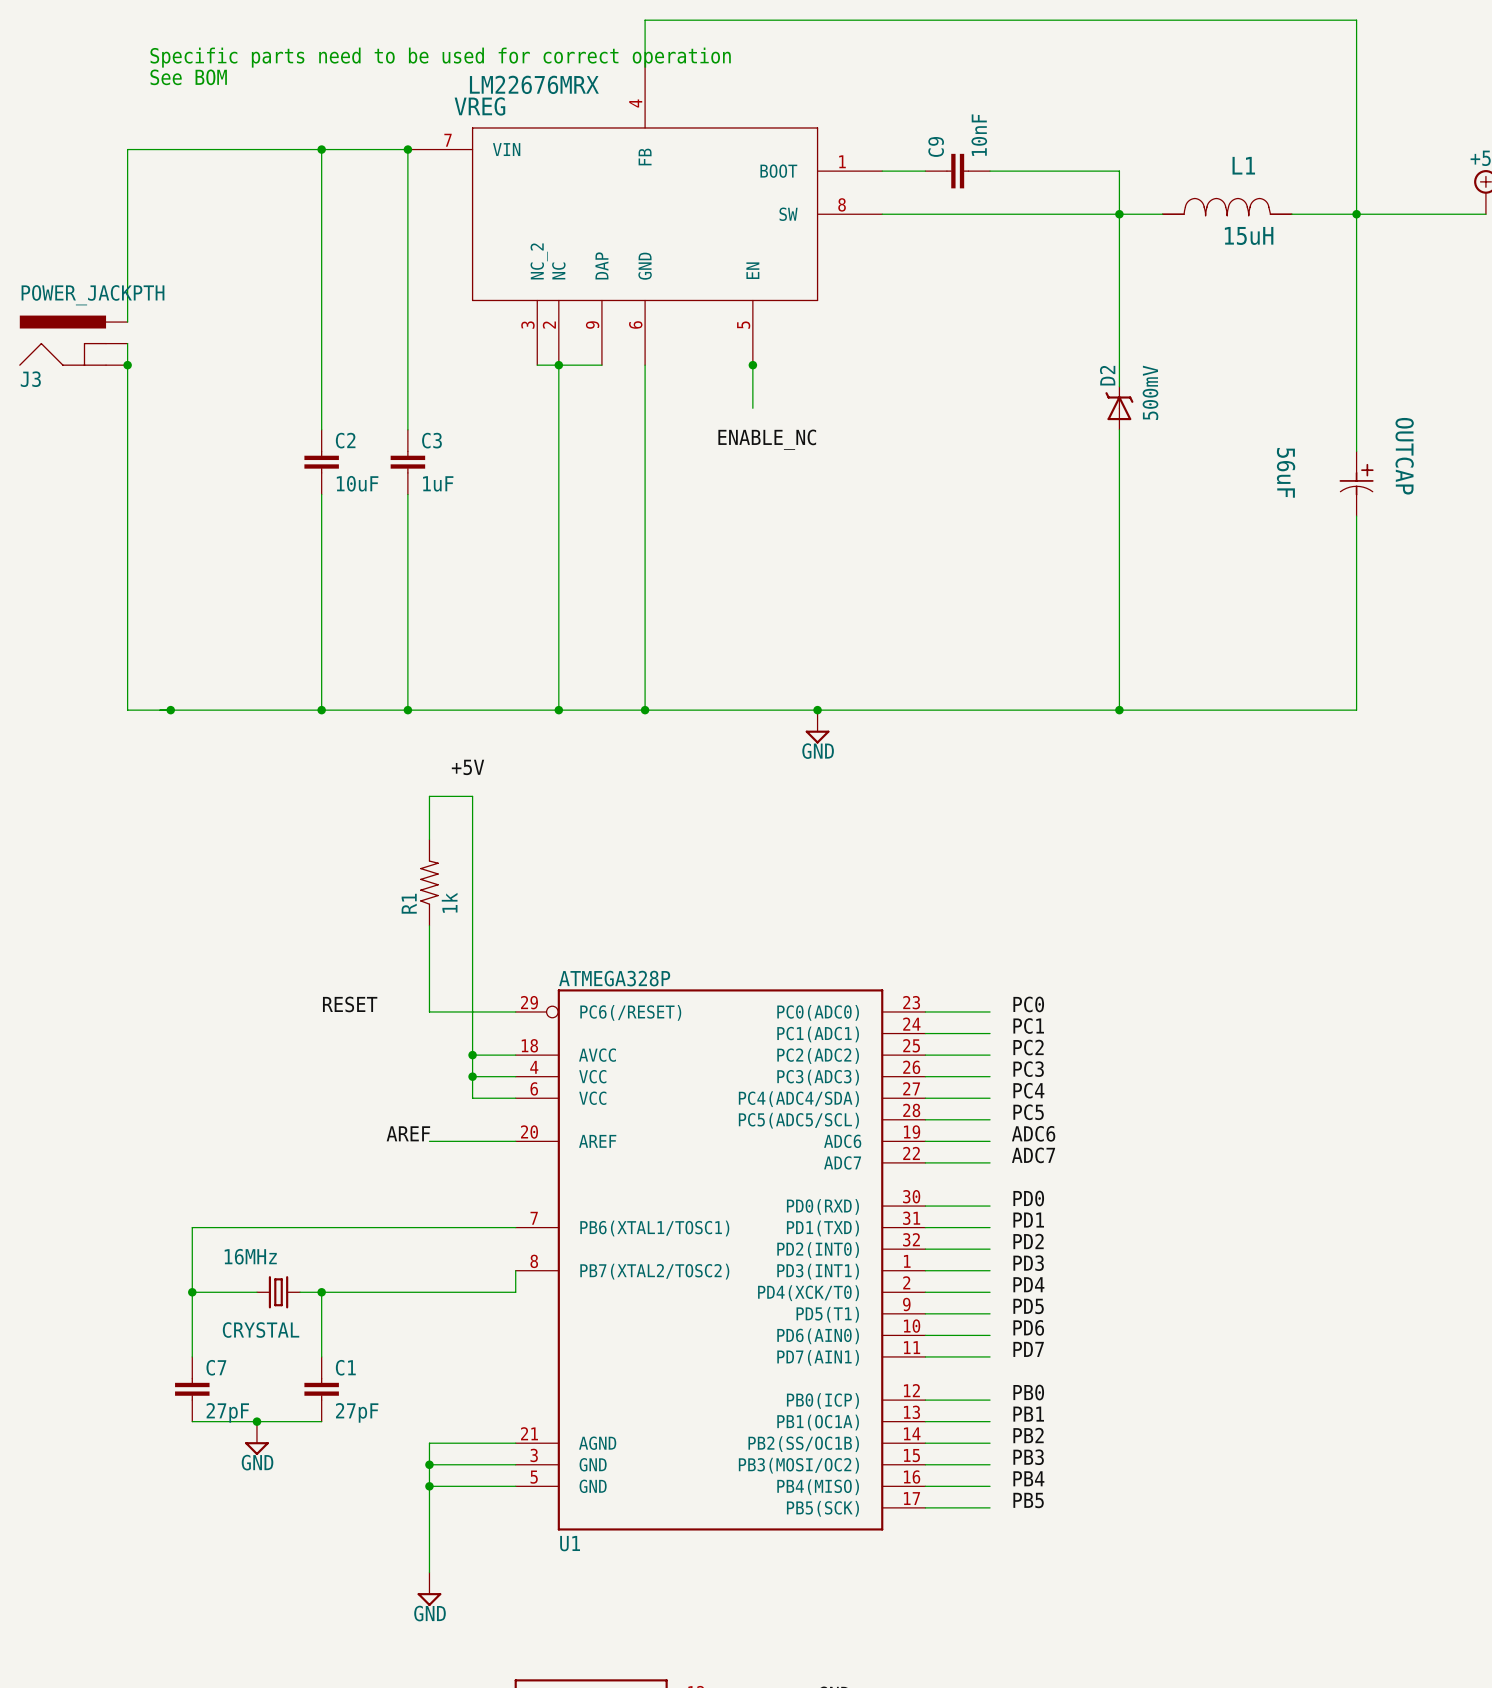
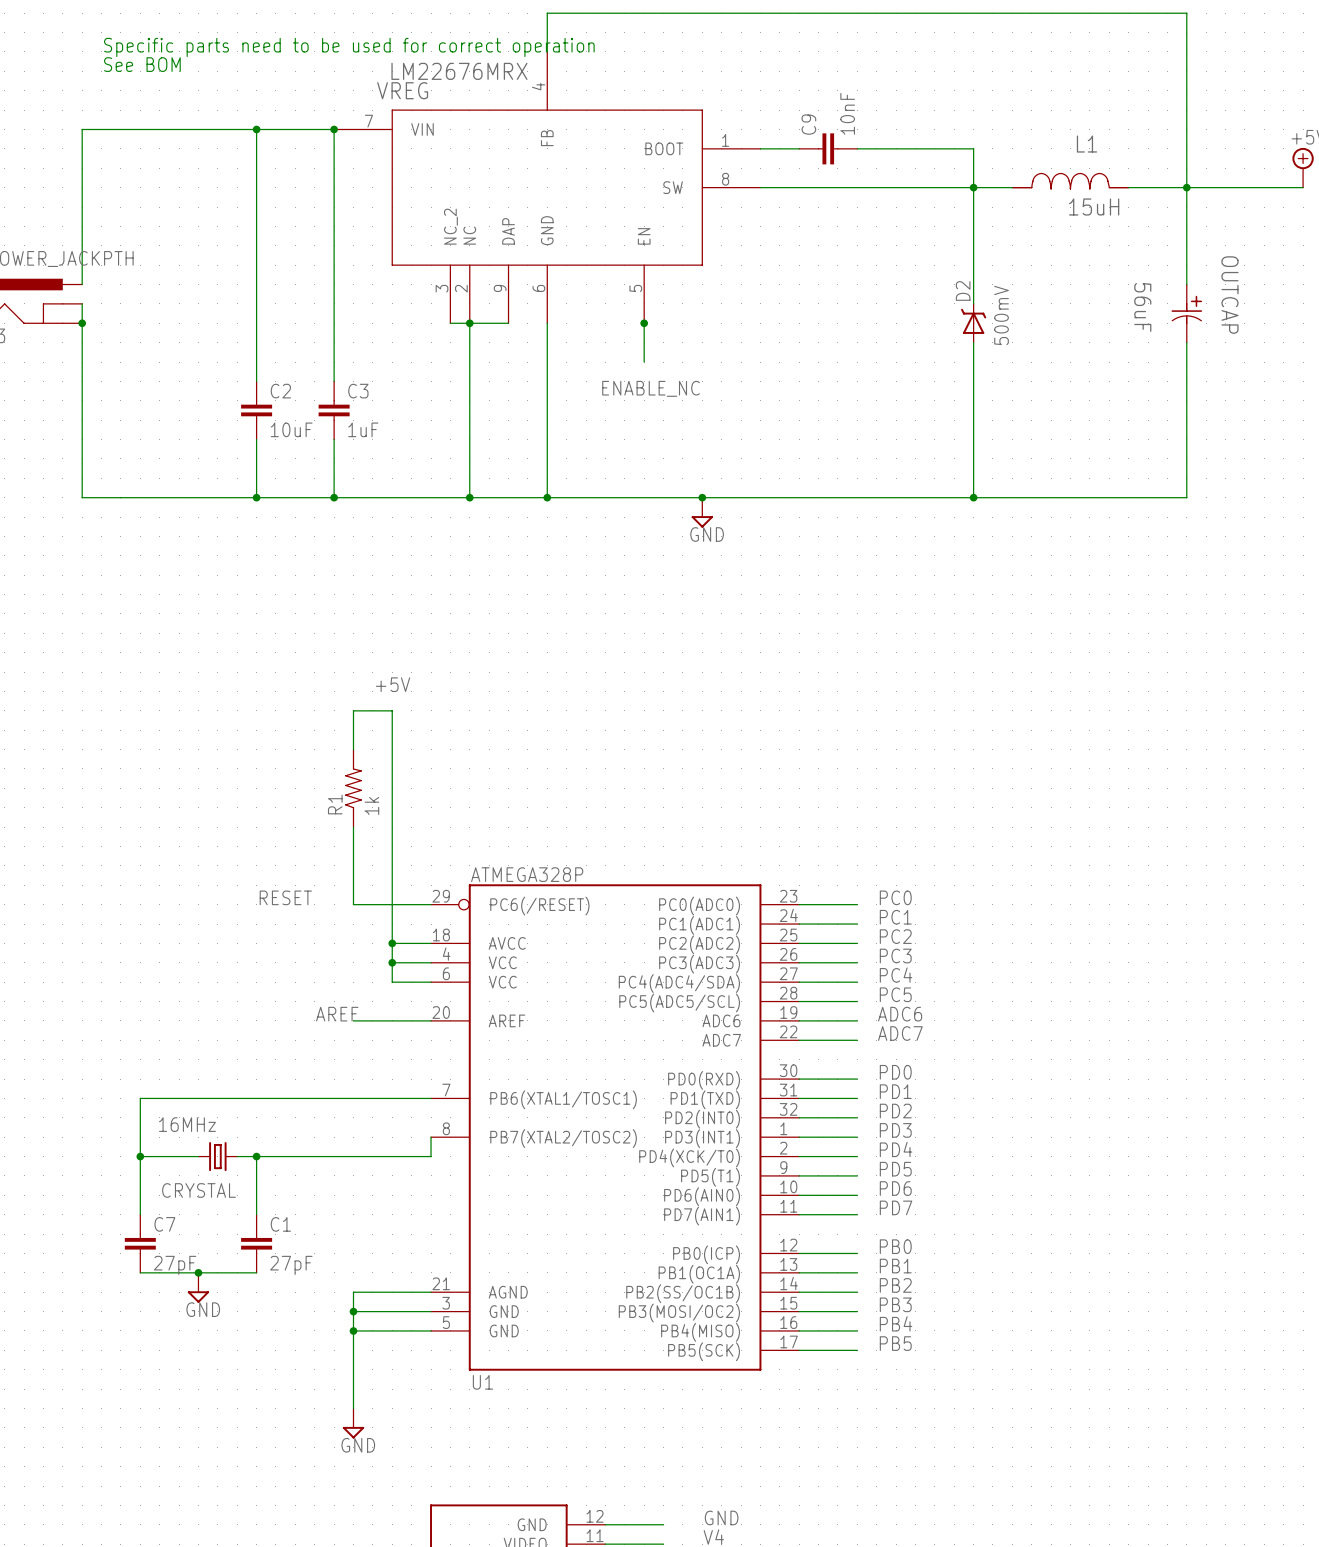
D2 position: (1119, 408) -> (973, 323)
OUTCAP value position: 56uF (1286, 472) -> 56uF (1142, 307)
OUTCAP position: (1356, 483) -> (1186, 313)
wire: (127, 559) (127, 710) (1356, 710) (1356, 559) -> (82, 497) (1186, 497)
wire: (321, 559) (321, 710) -> none
junction: none -> (256, 497)
wire: (407, 559) (407, 710) -> none
junction: none -> (334, 497)
wire: (558, 559) (558, 710) -> none
junction: none -> (469, 497)
wire: (645, 559) (645, 710) -> none
junction: none -> (547, 497)
junction: none -> (702, 497)
wire: (1119, 559) (1119, 710) -> none
junction: none -> (973, 497)
junction: (170, 710) -> none
junction: (321, 710) -> none
junction: (407, 710) -> none
junction: (558, 710) -> none
junction: (645, 710) -> none
junction: (817, 710) -> none
junction: (1119, 710) -> none
power symbol position: GND (817, 726) -> GND (702, 512)

